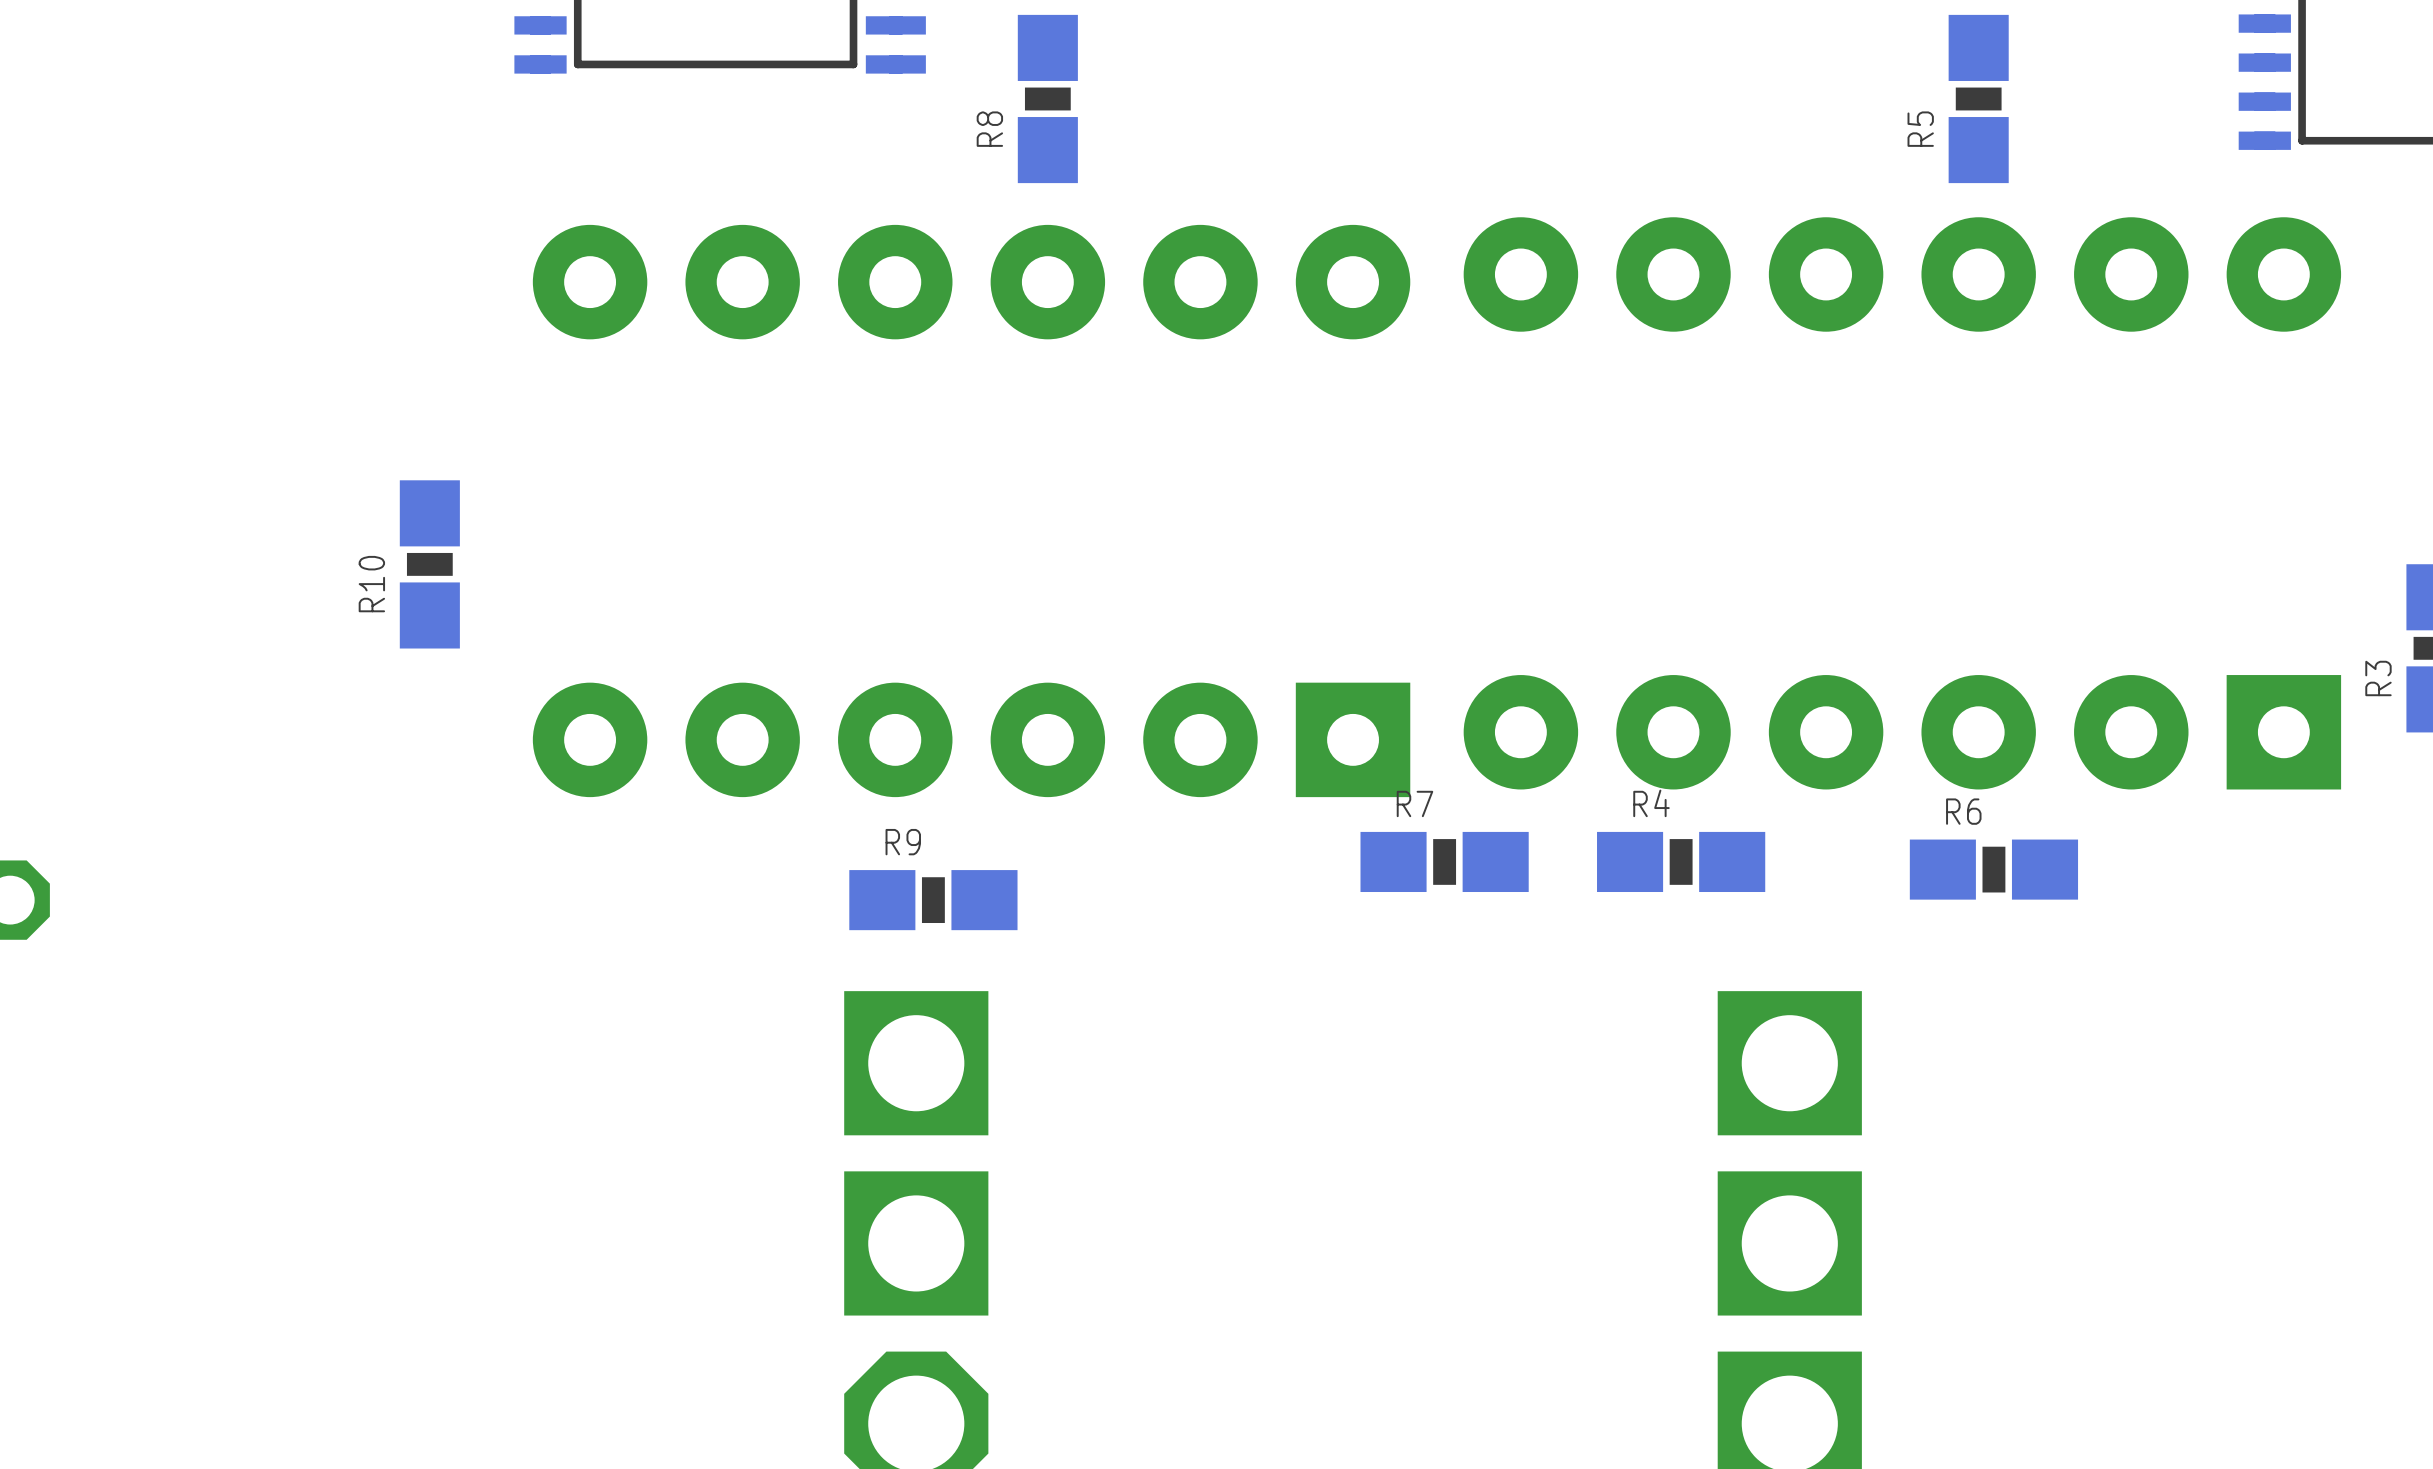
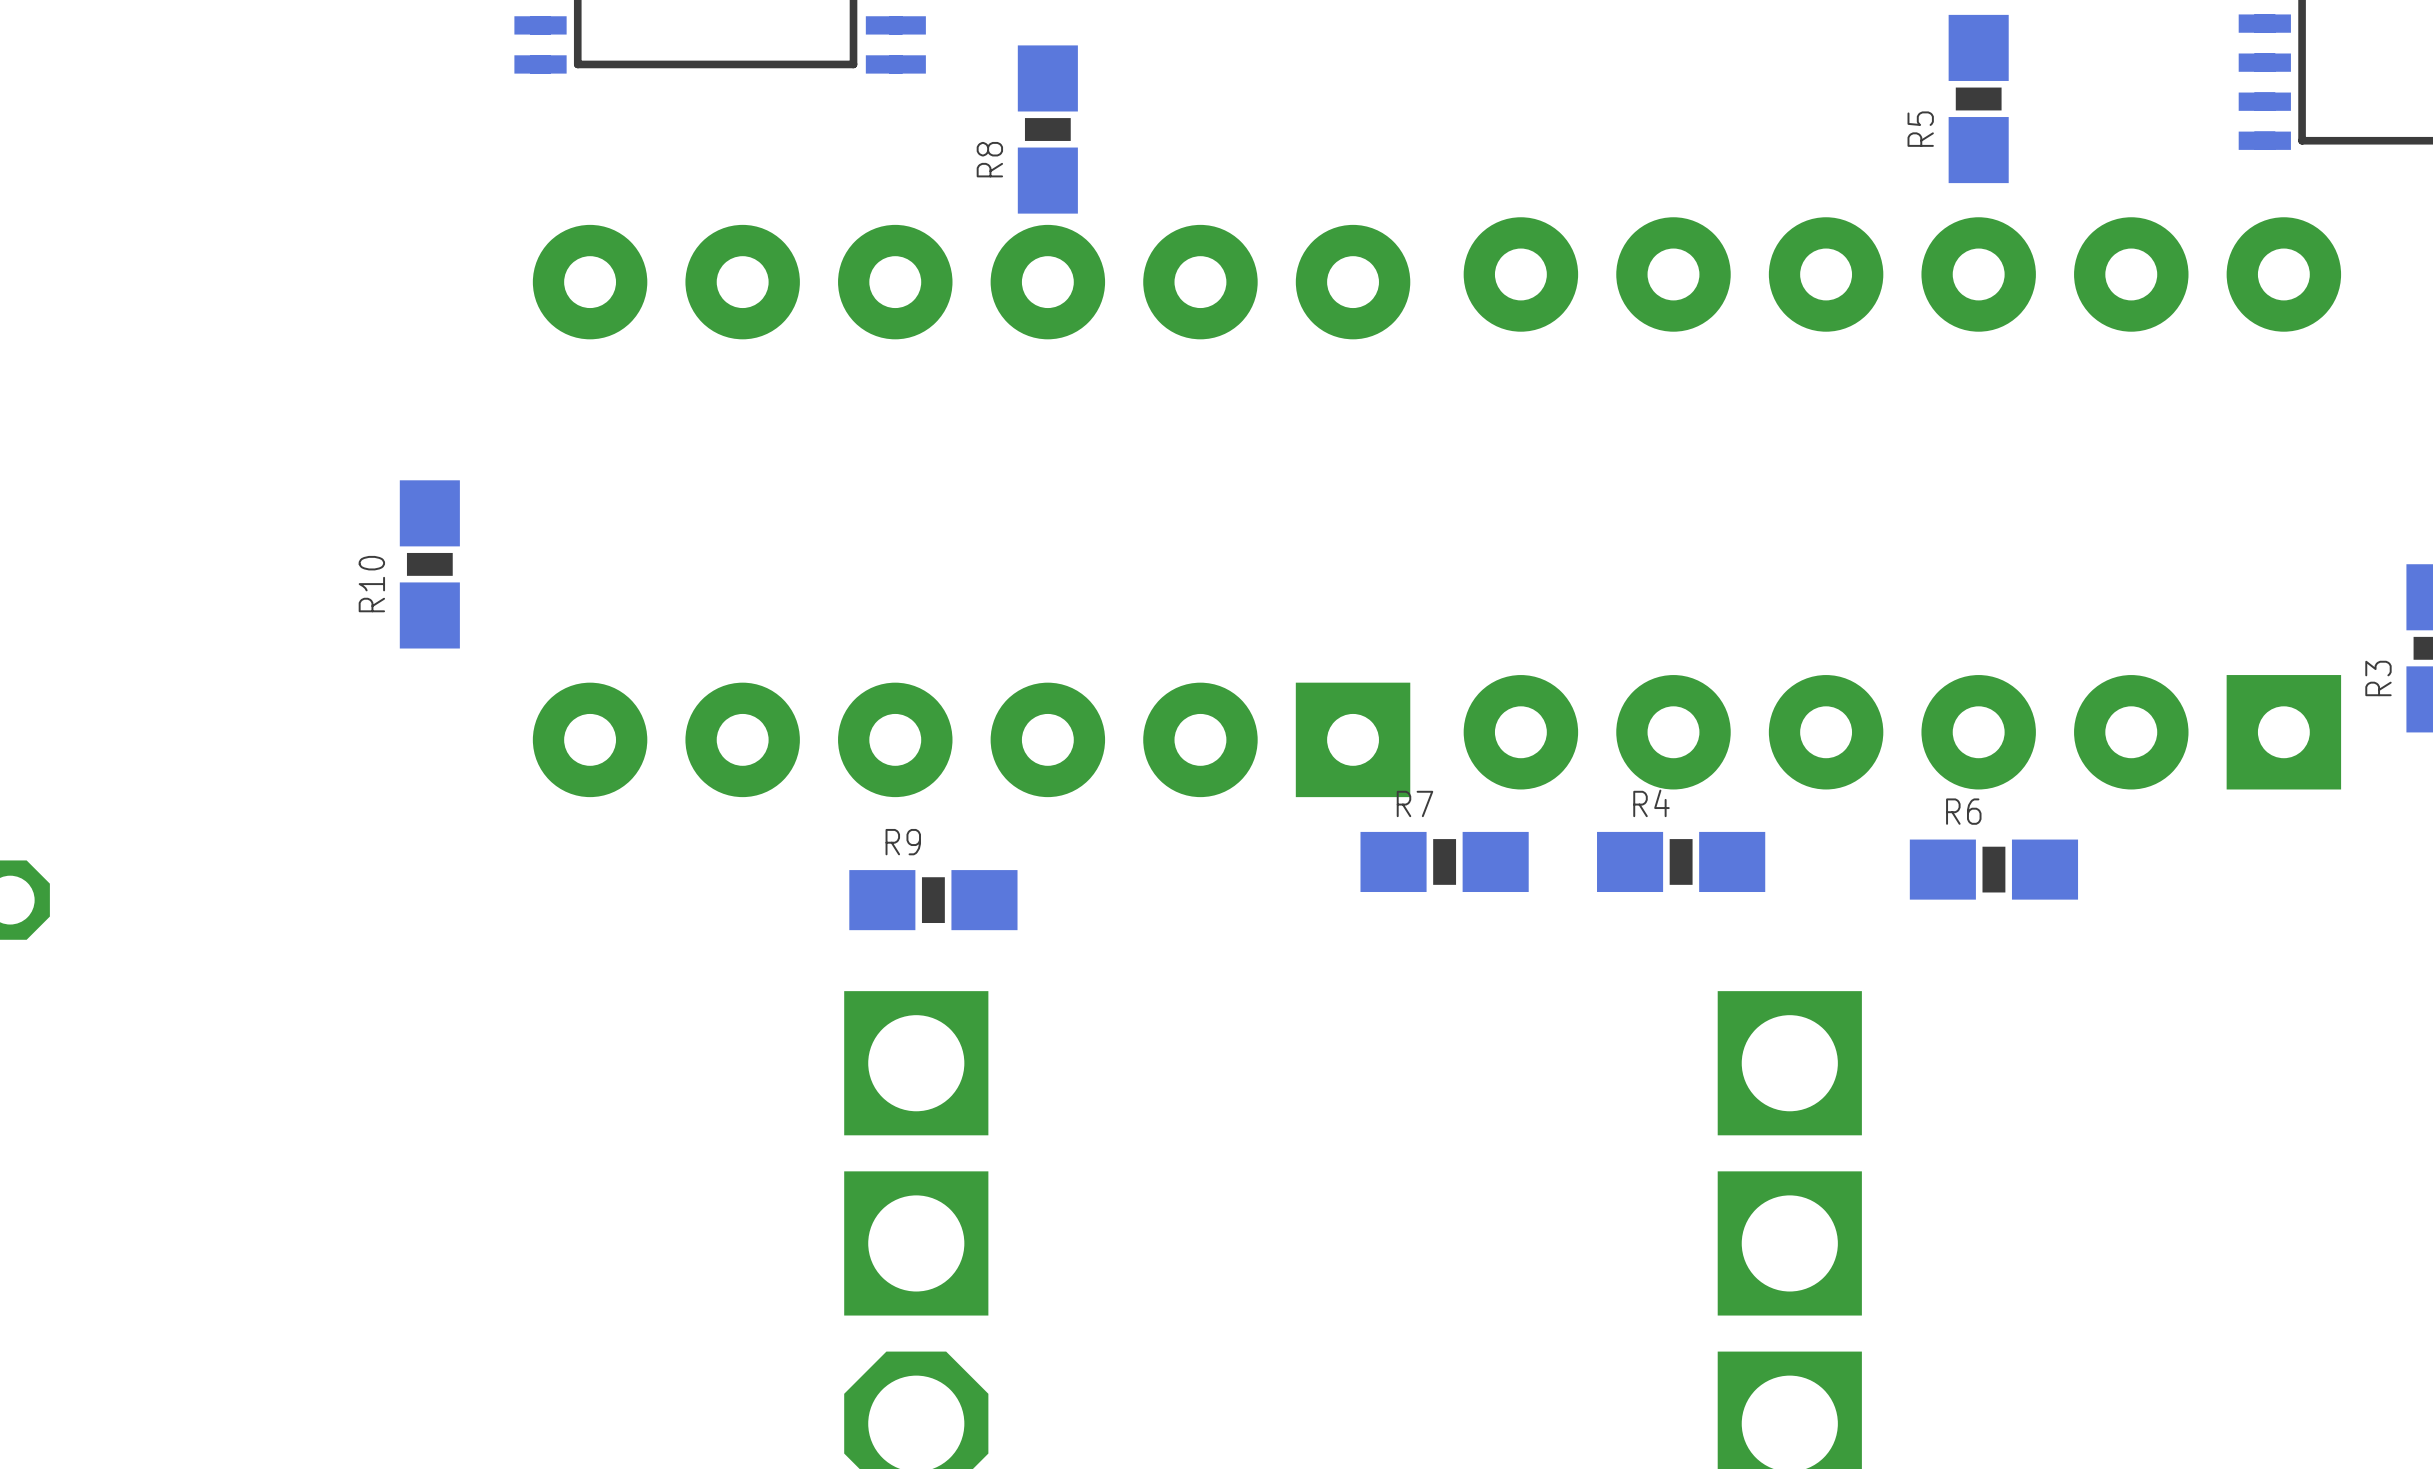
R8 position: (1047, 98) -> (1047, 129)

